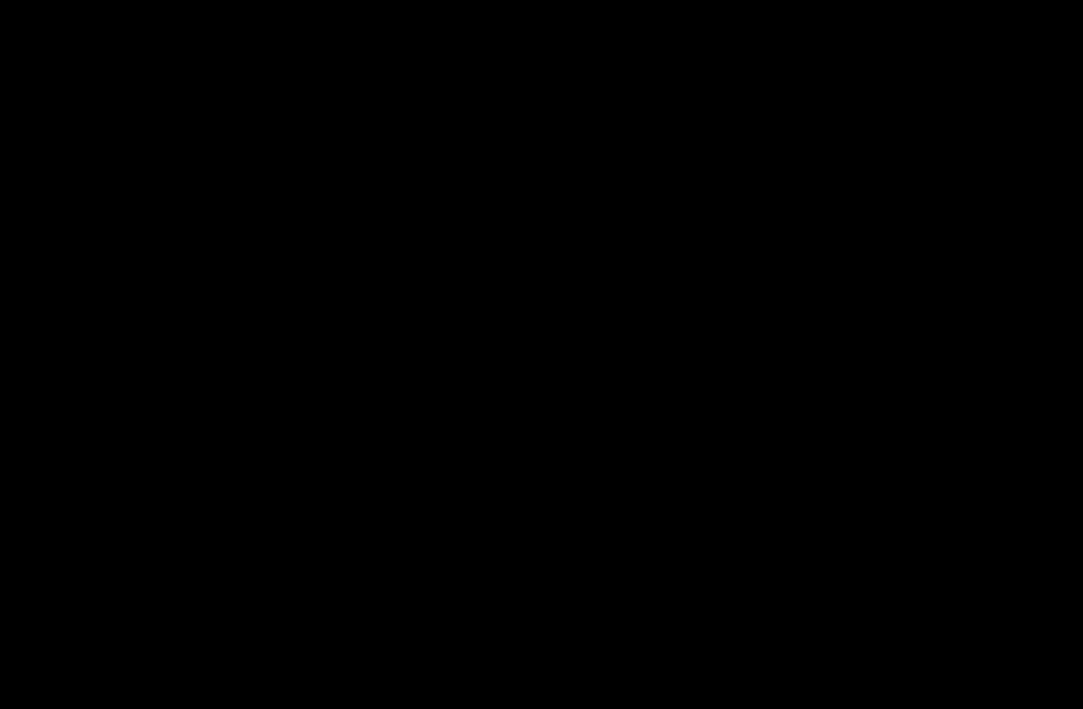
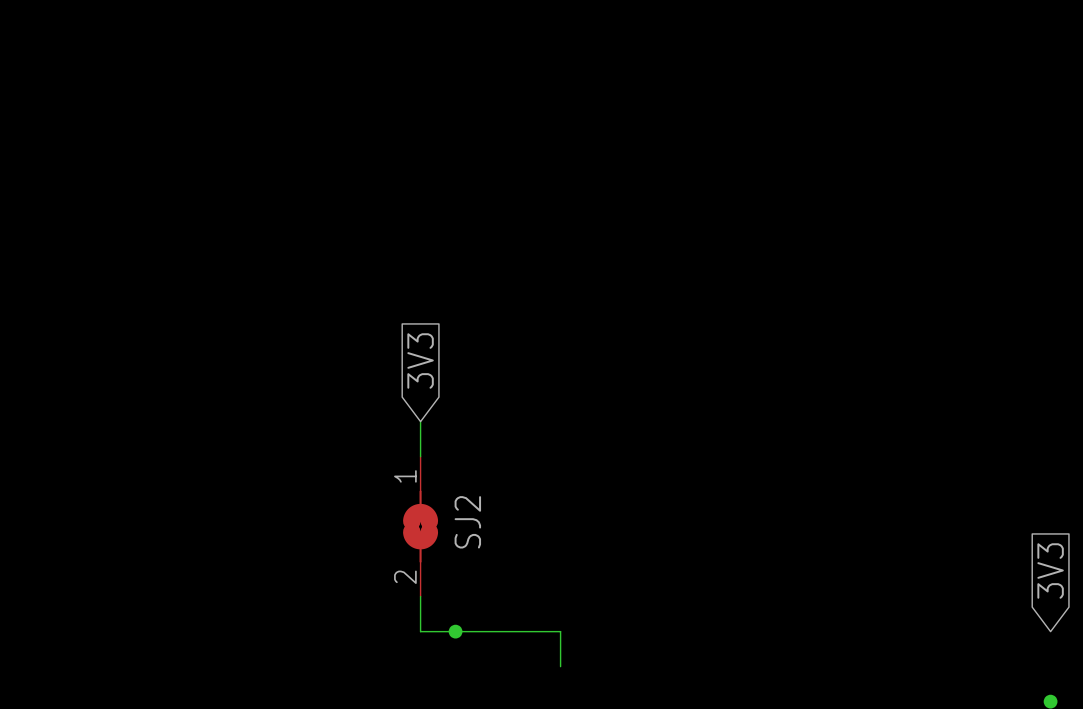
global label: none -> 3V3 (420, 361)
wire: none -> (420, 421) (420, 456)
SJ2: none -> (420, 526)
global label: none -> 3V3 (1050, 571)
wire: none -> (420, 596) (420, 631) (560, 631) (560, 666)
junction: none -> (455, 631)
junction: none -> (1050, 701)

